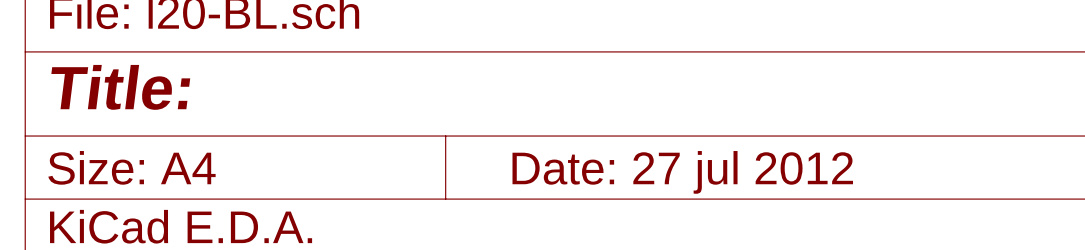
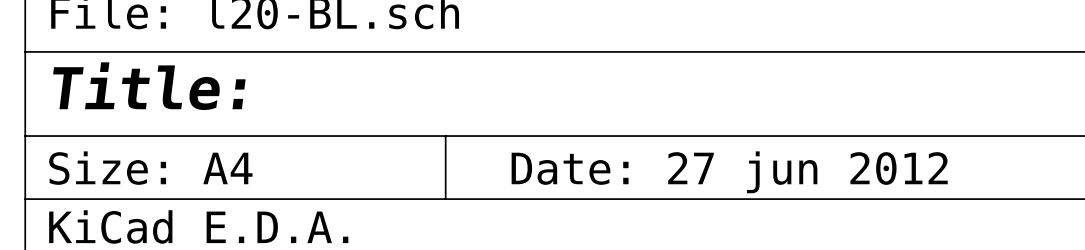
title block: Date: 27 jul 2012 (682, 172) -> Date: 27 jun 2012 (729, 172)

